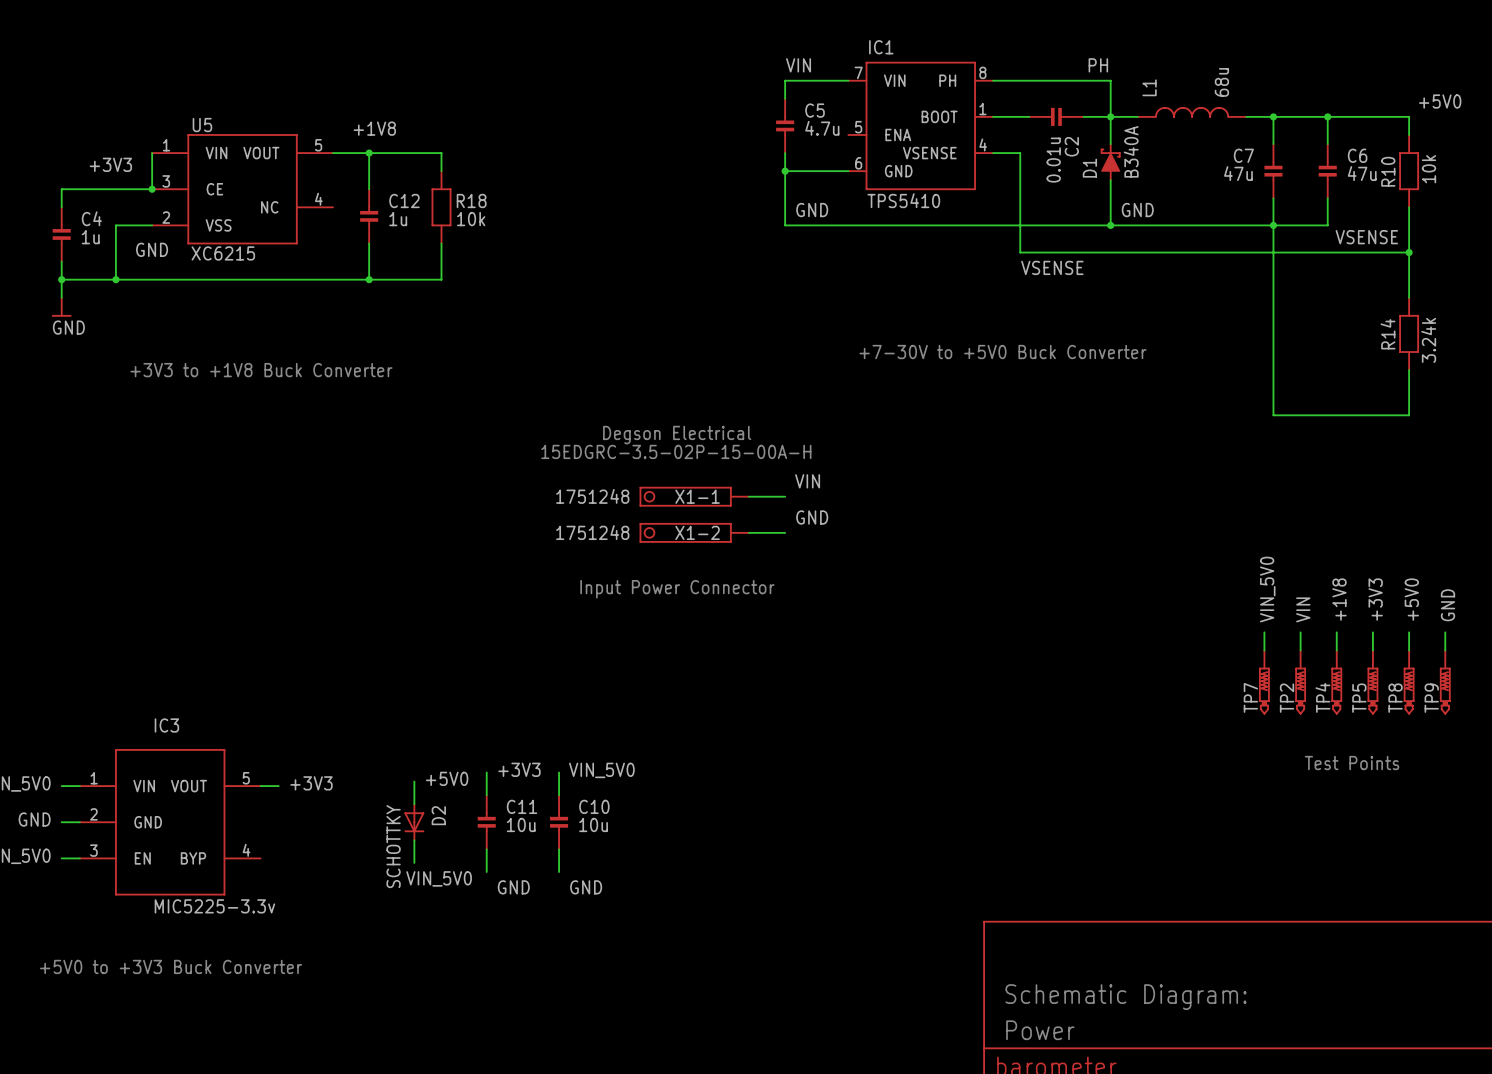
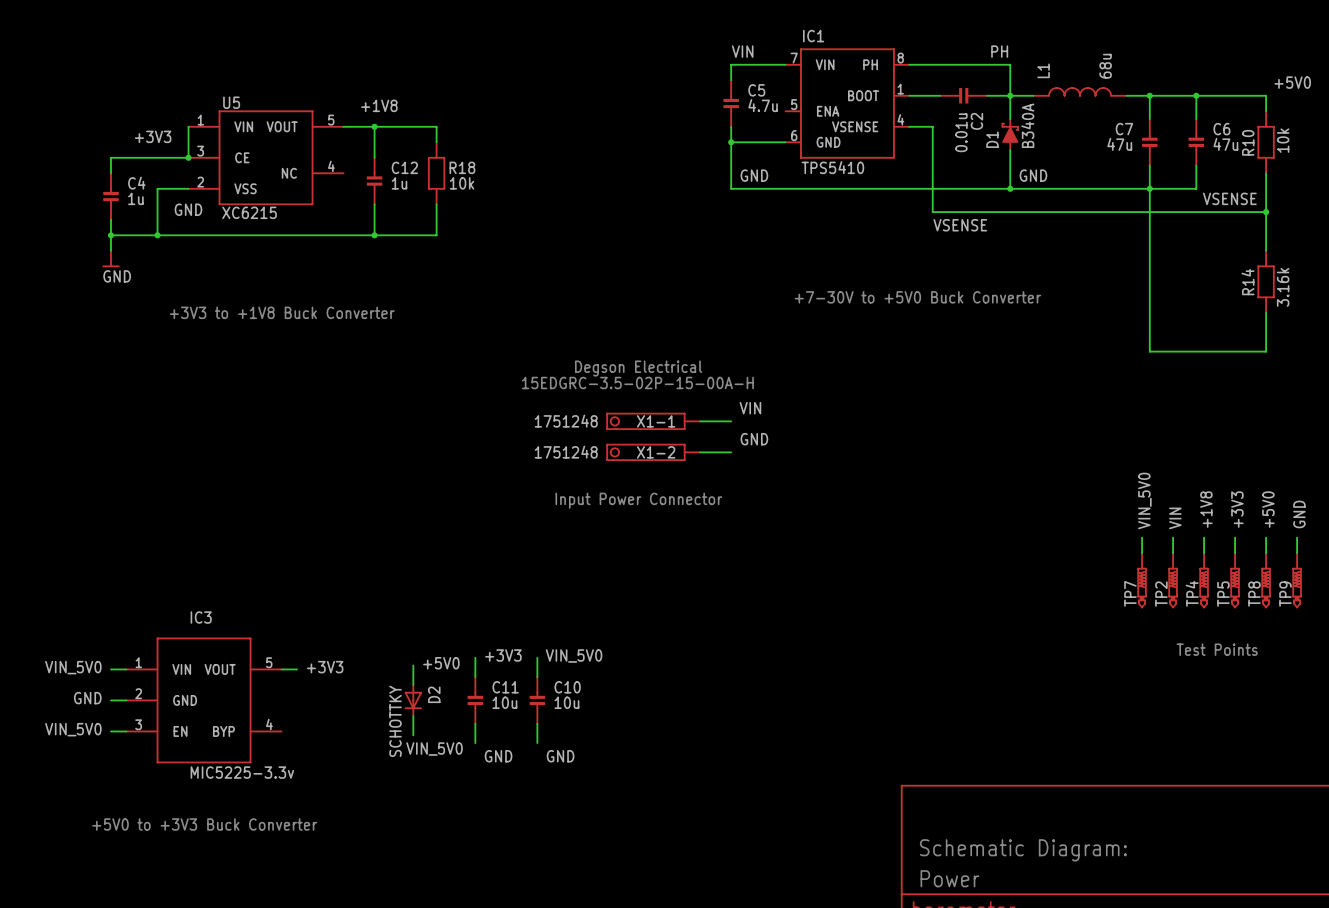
R14 value: 3.24k (1428, 340) -> 3.16k (1283, 287)

